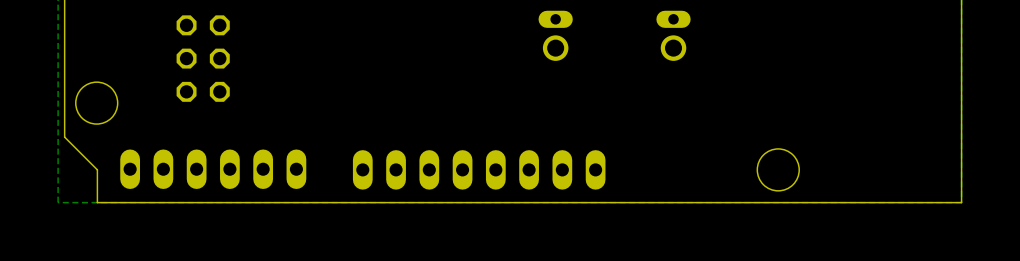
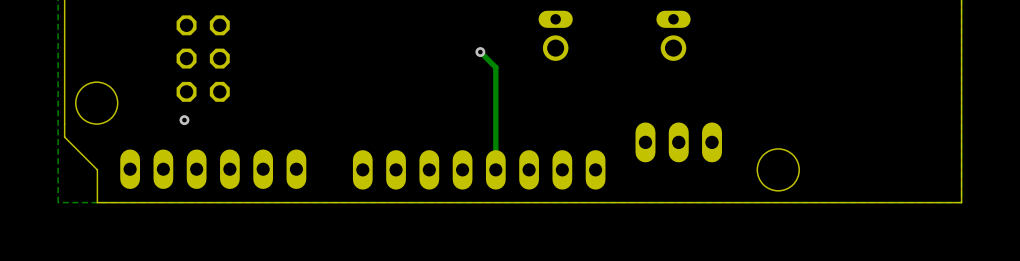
track: none -> (480, 52) (495, 67) (495, 156)
via: none -> (480, 52)
via: none -> (184, 120)
part: none -> (678, 142)

